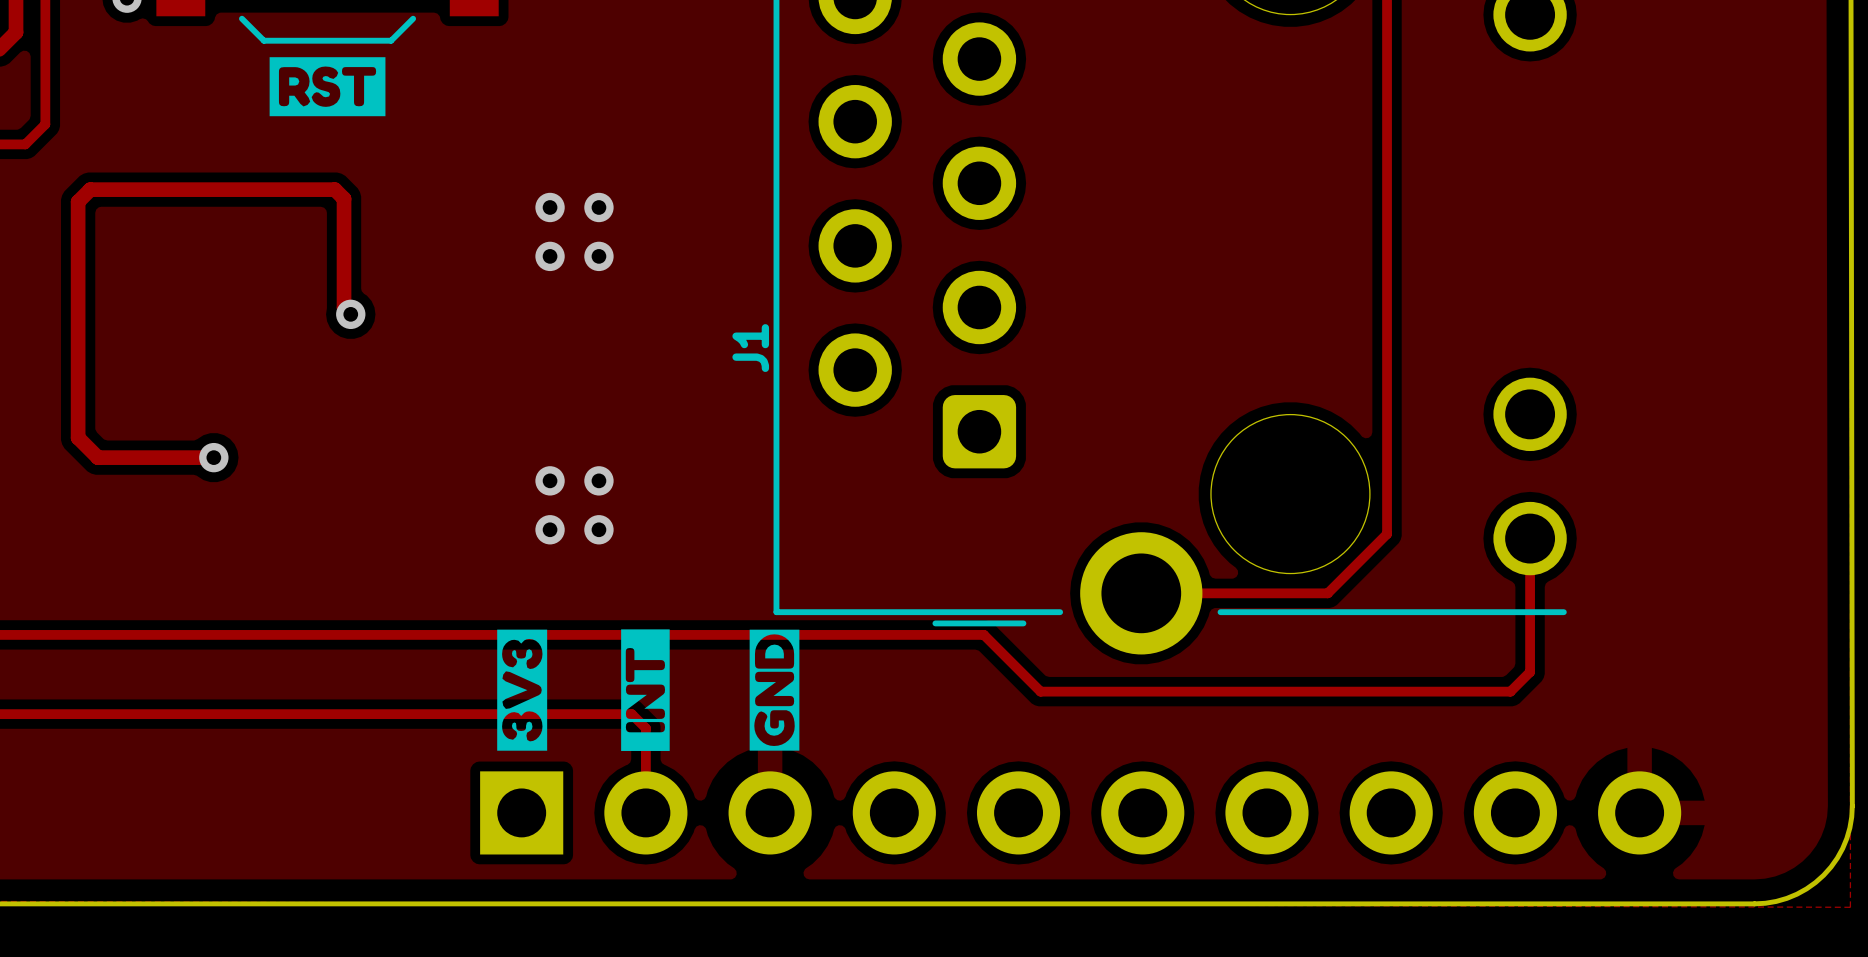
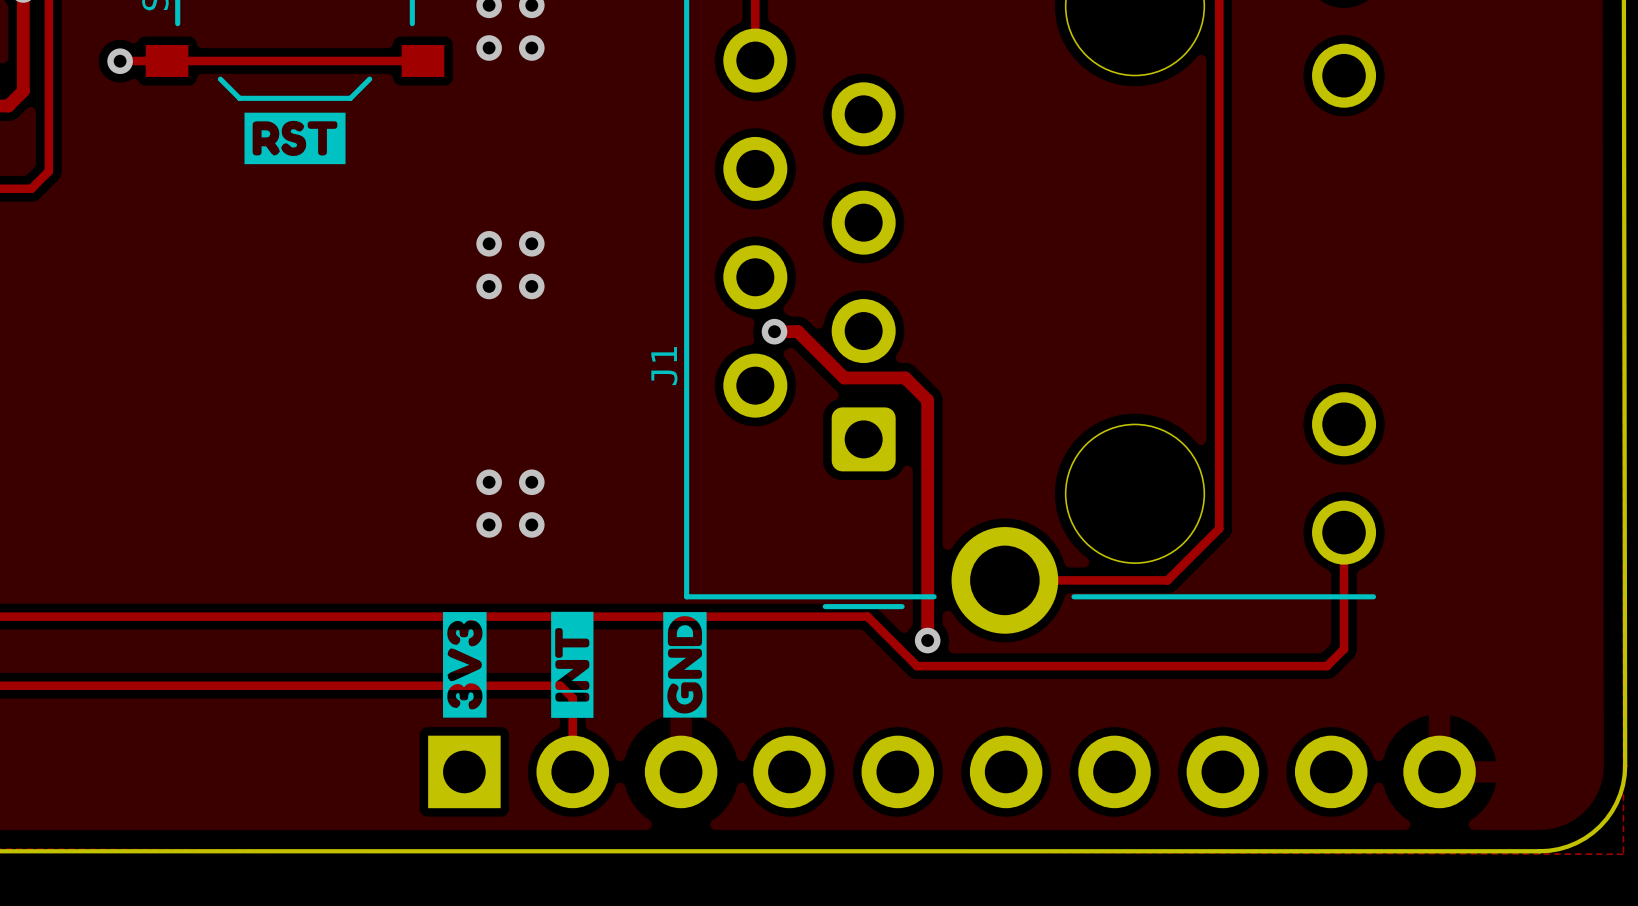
track: none -> (774, 331) (797, 331) (844, 377) (905, 377) (927, 400) (927, 640)
via: none -> (774, 331)
track: (350, 314) (344, 307) (344, 198) (334, 189) (90, 189) (78, 201) (78, 437) (97, 457) (213, 457) -> none
via: (350, 314) -> none
via: (213, 457) -> none
via: none -> (927, 640)

